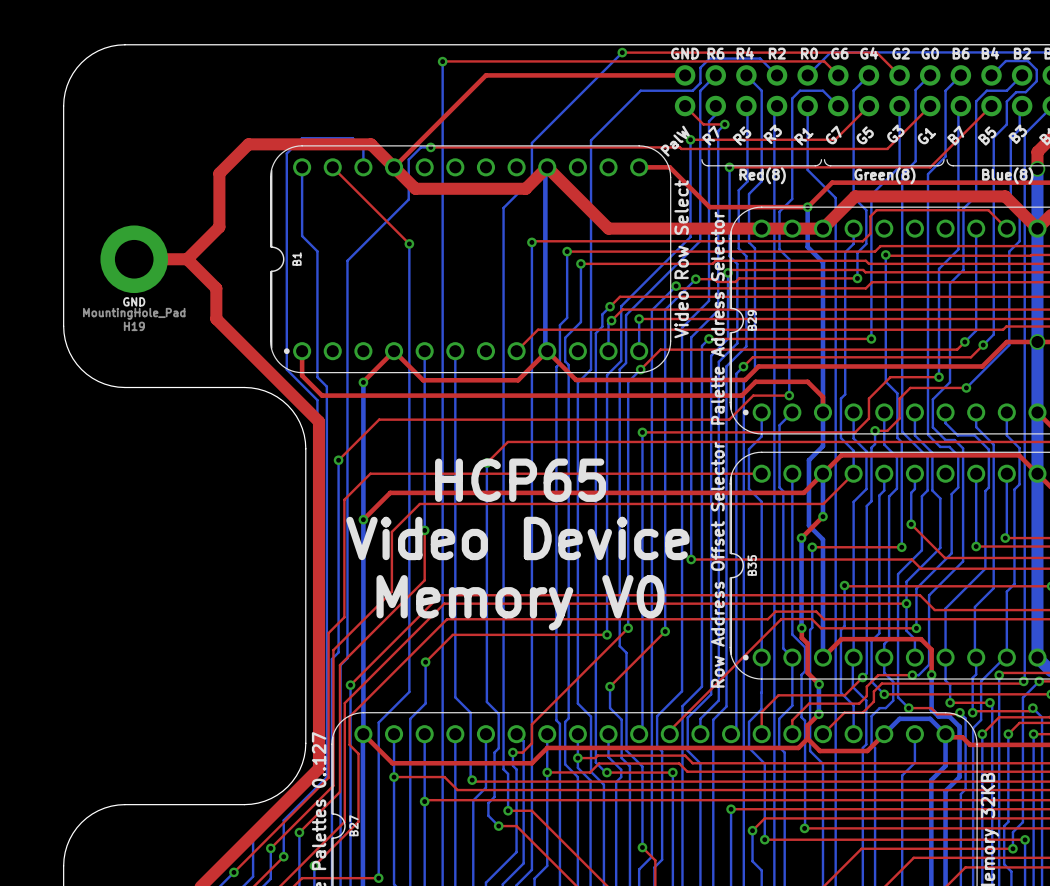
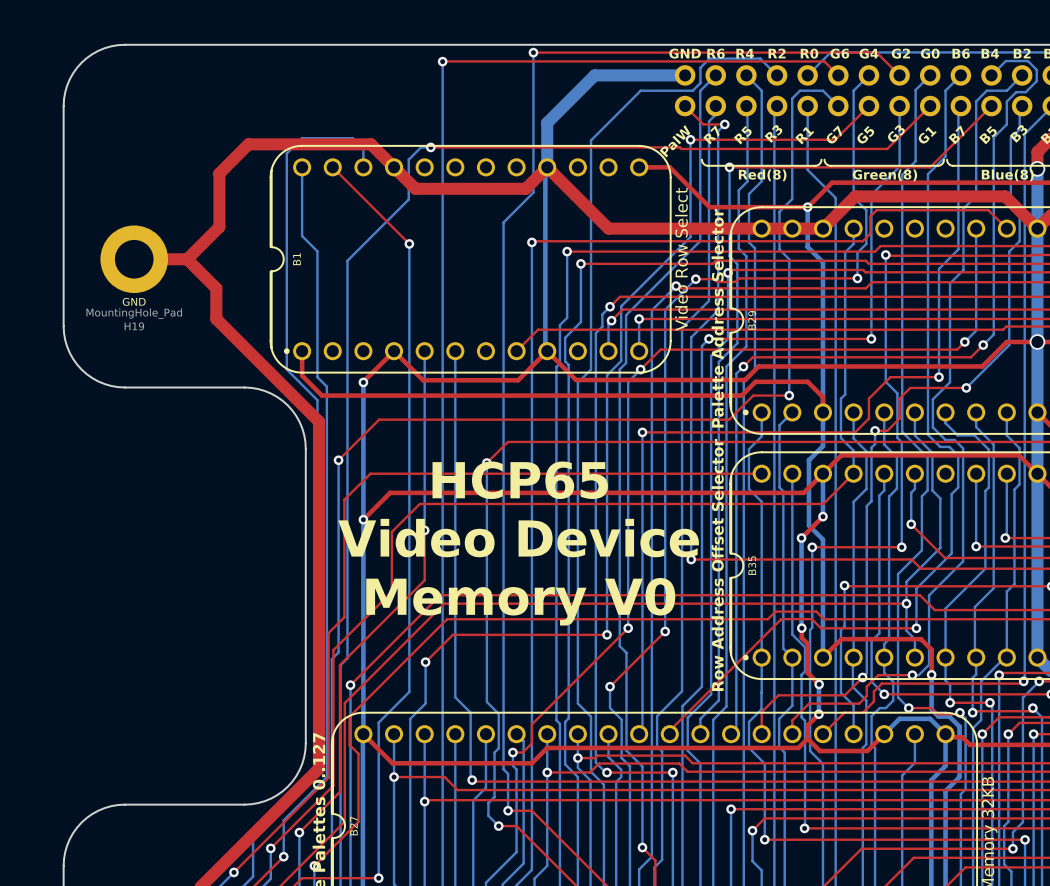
top track: none -> (533, 52) (622, 52)
via: none -> (533, 52)
bottom track: (622, 52) (531, 143) (531, 179) (503, 207) (503, 222) -> (533, 52) (533, 192) (503, 222)
via: (622, 52) -> none
top track: (685, 75) (485, 75) (394, 167) -> none
bottom track: none -> (685, 75) (594, 75) (547, 122) (547, 167)

